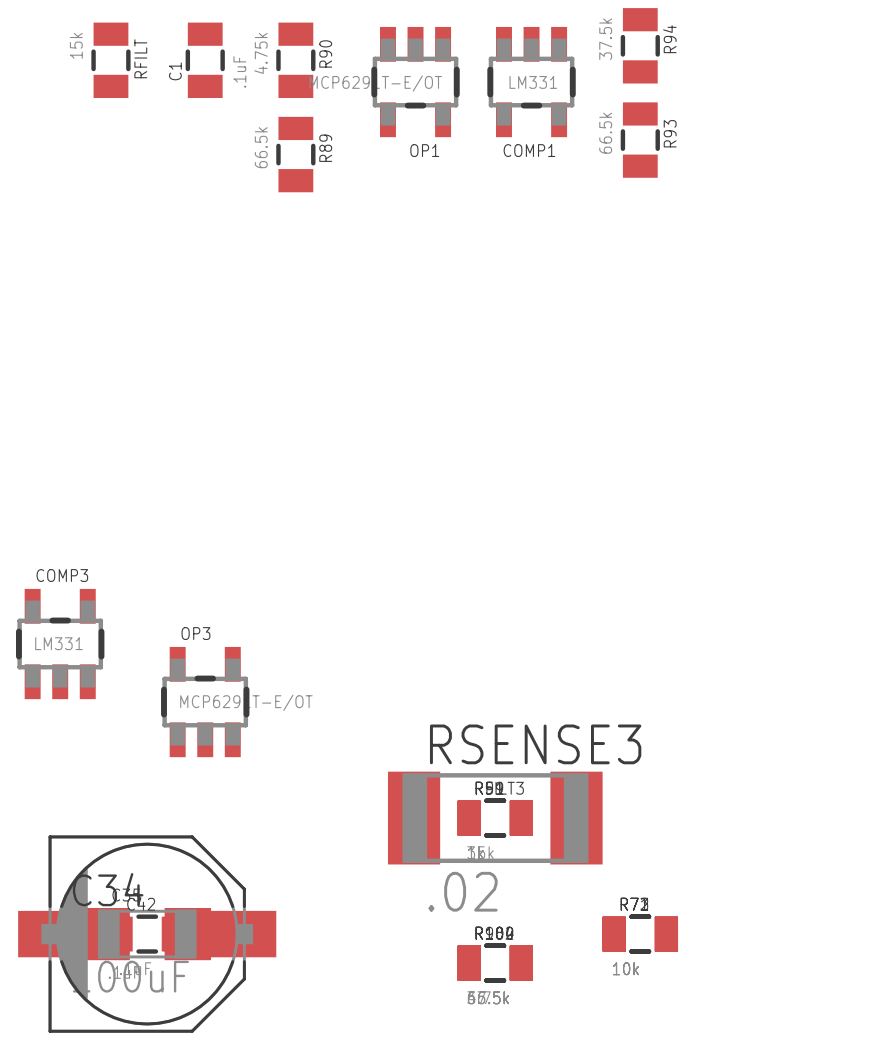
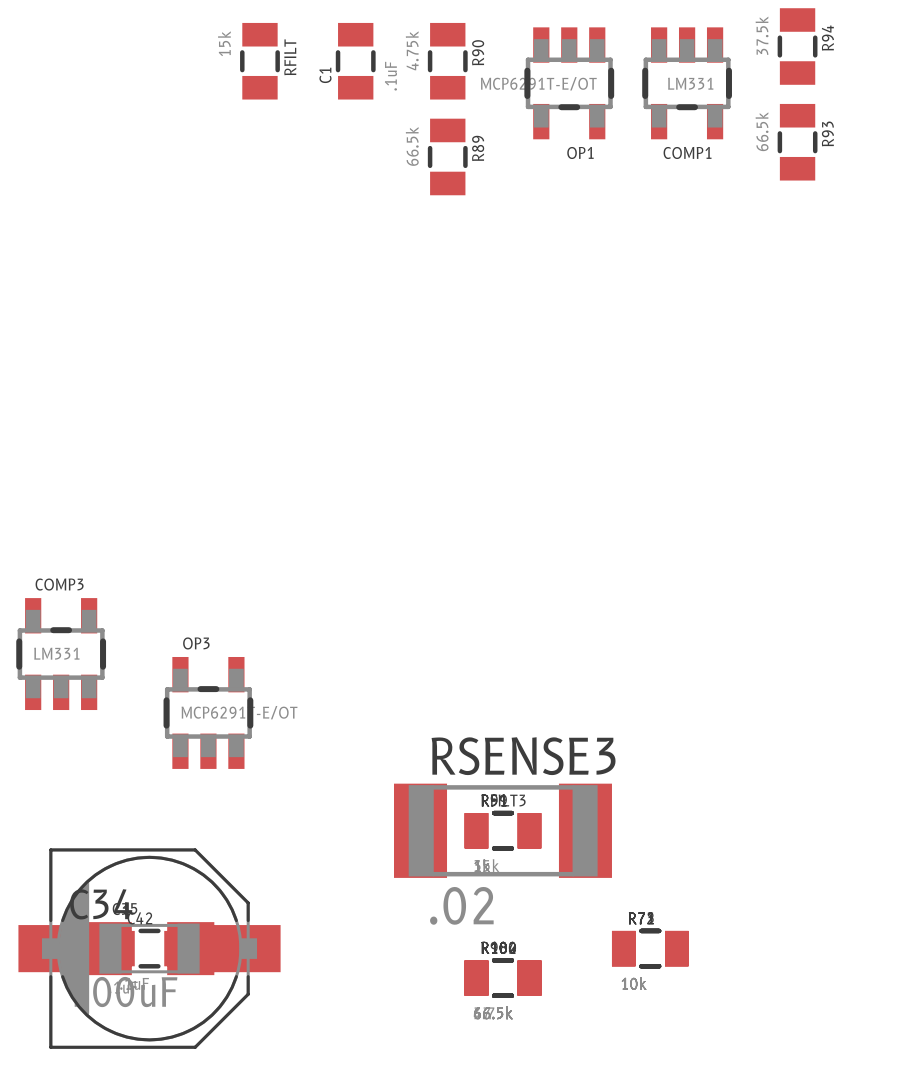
R94 position: (640, 45) -> (797, 46)
RFILT position: (110, 60) -> (259, 61)
C1 position: (205, 60) -> (355, 61)
R90 position: (295, 60) -> (447, 61)
OP1 position: (415, 82) -> (569, 83)
COMP1 position: (531, 82) -> (687, 83)
R93 position: (640, 140) -> (797, 142)
R89 position: (295, 154) -> (447, 156)

